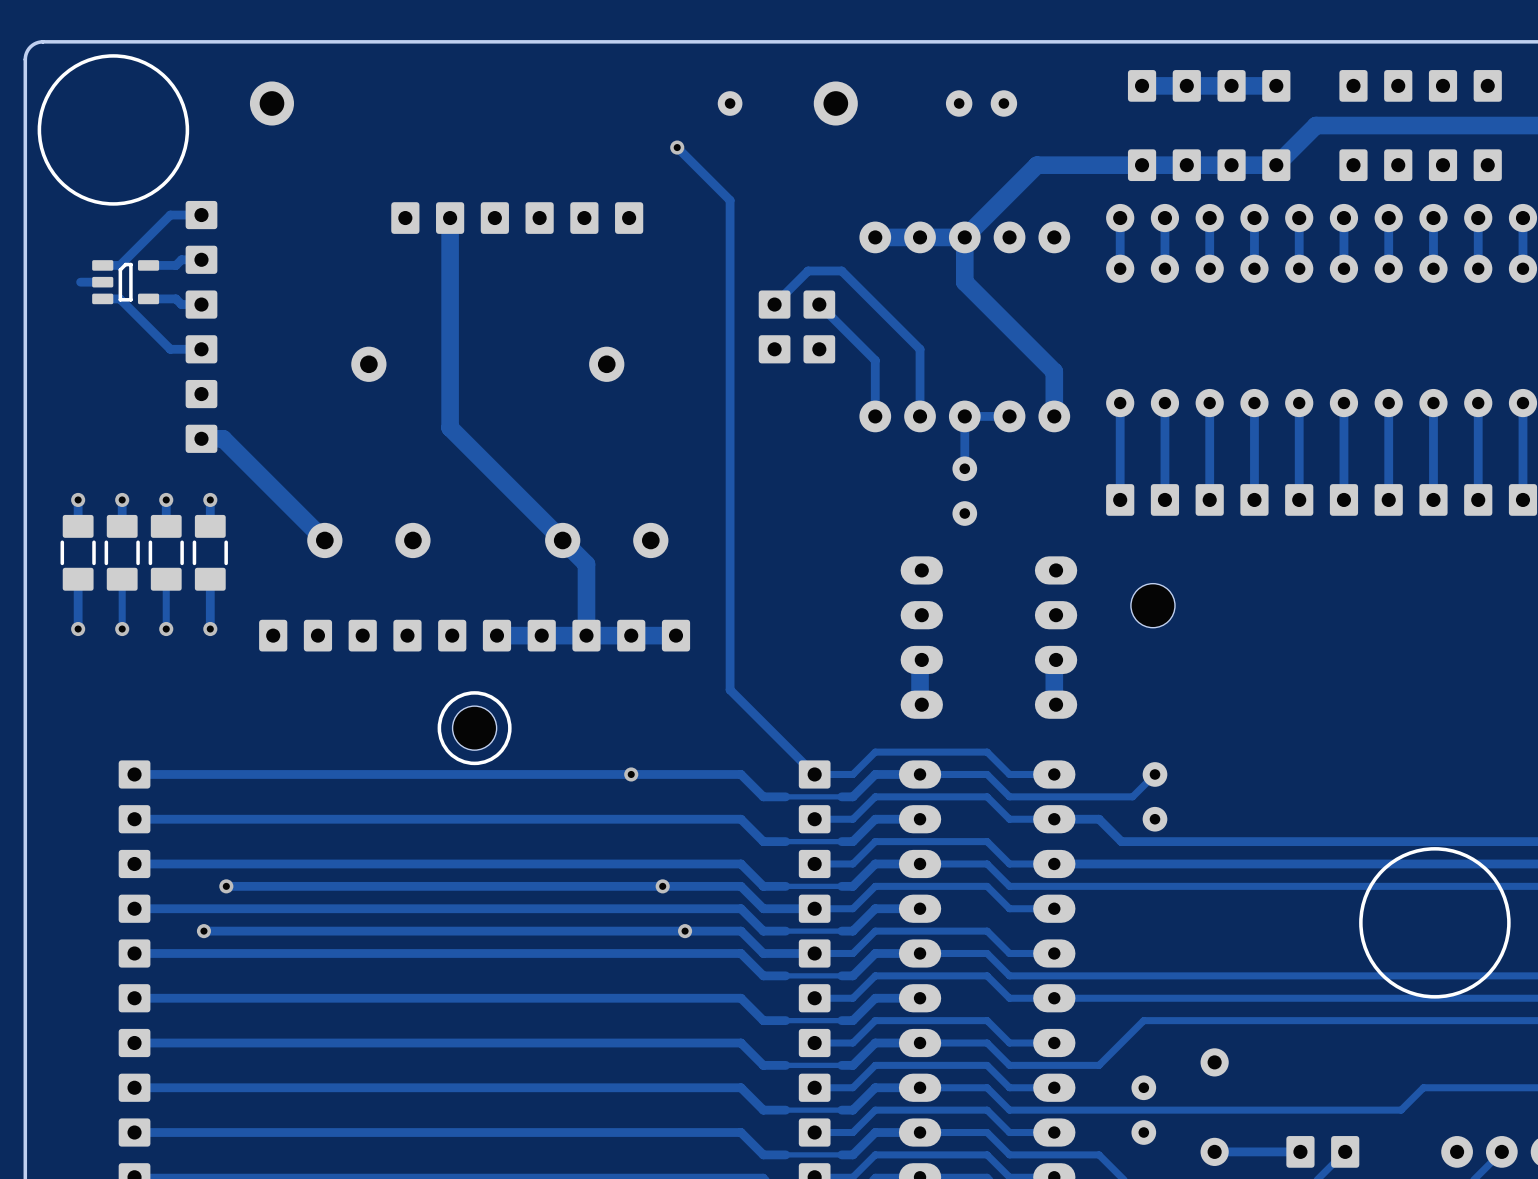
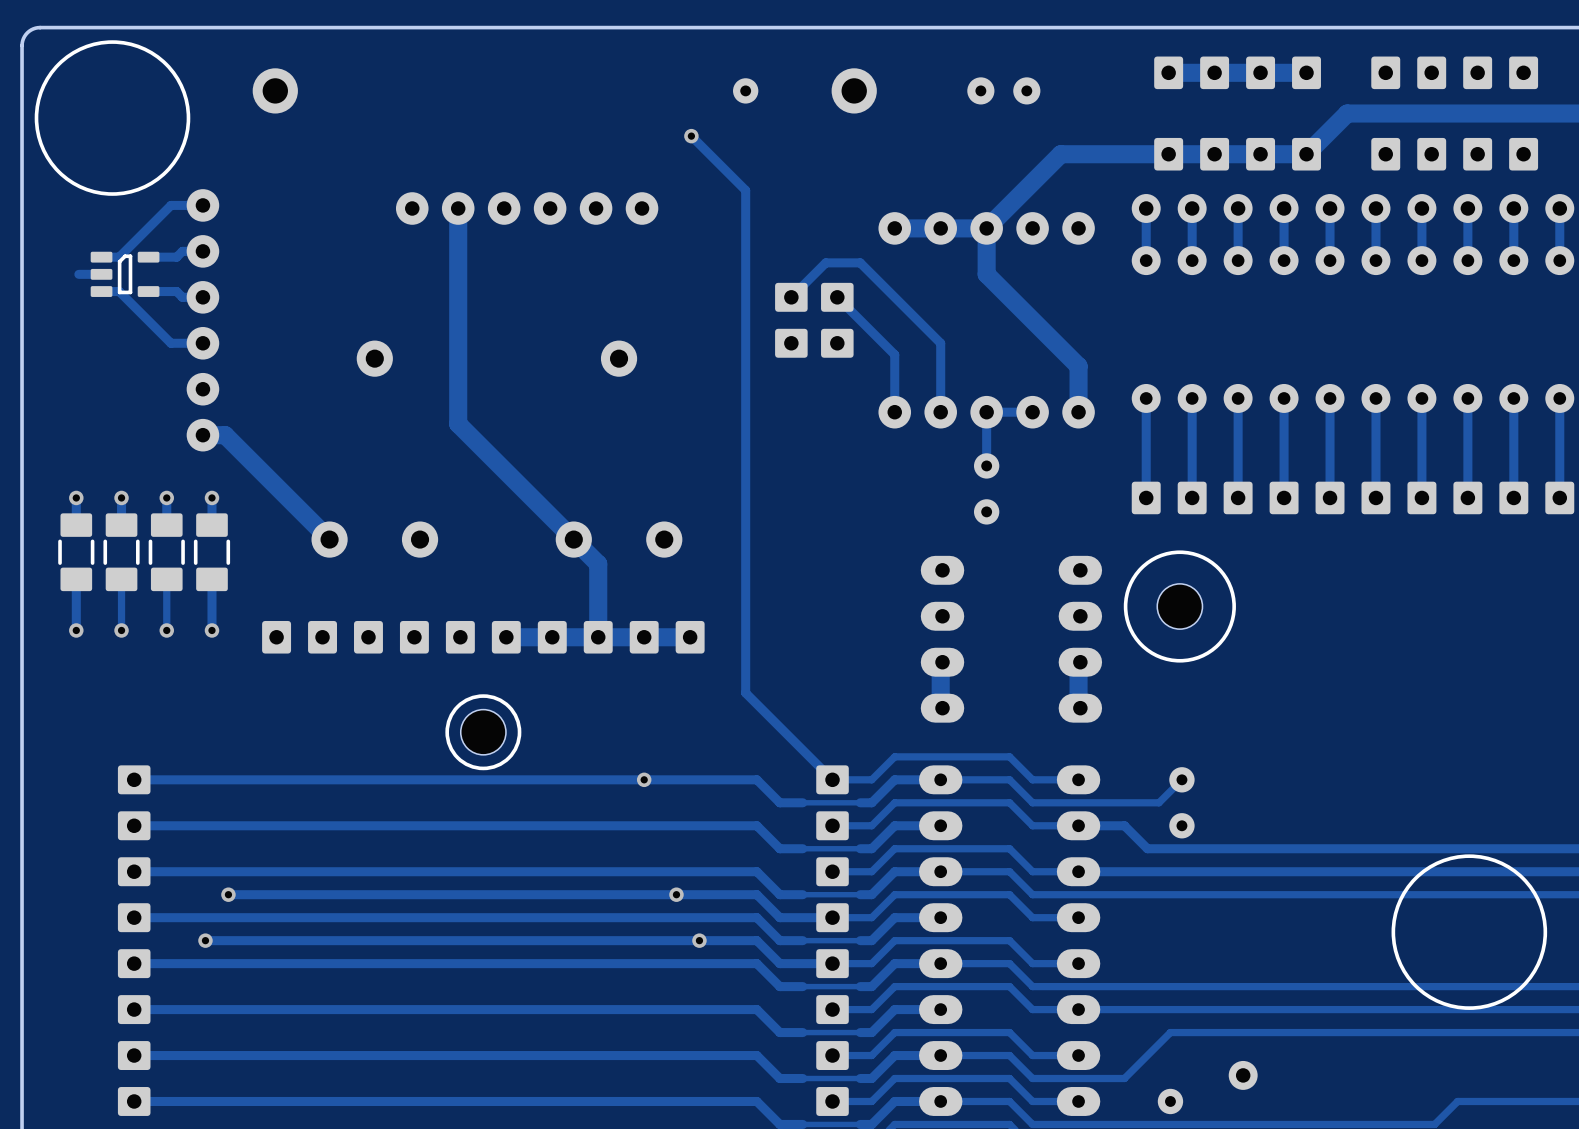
part footprint: [185, 200, 218, 453] -> [186, 189, 220, 452]
part footprint: [391, 202, 644, 234] -> [395, 192, 659, 225]
part footprint: [1130, 583, 1175, 628] -> [1123, 550, 1236, 663]

